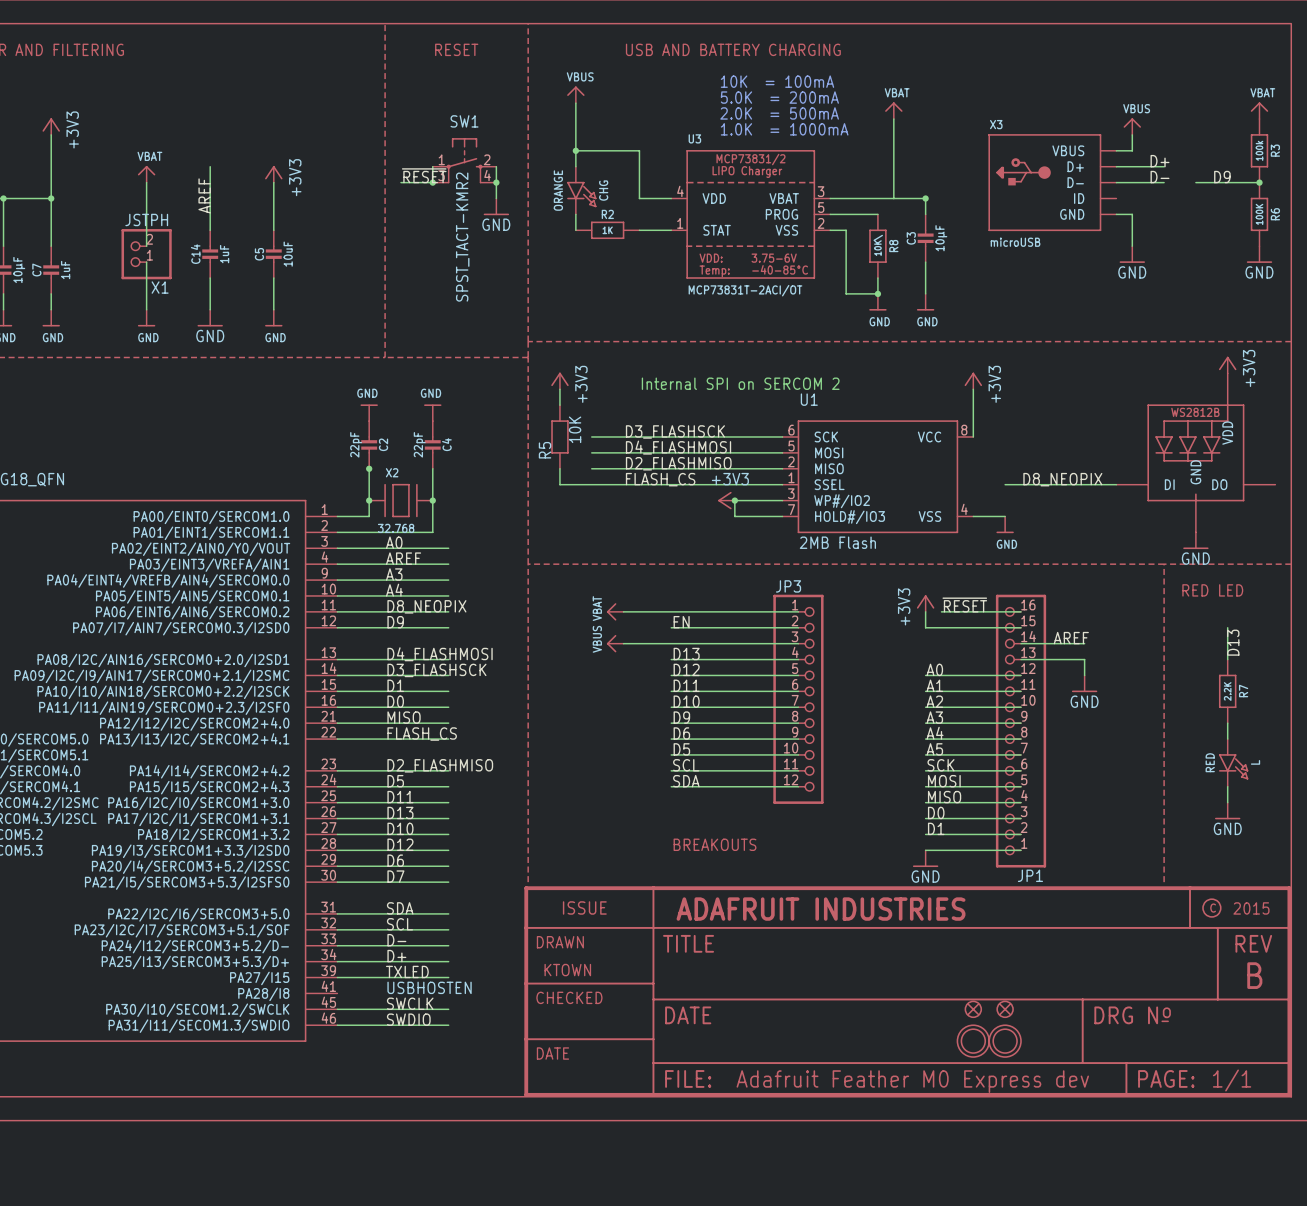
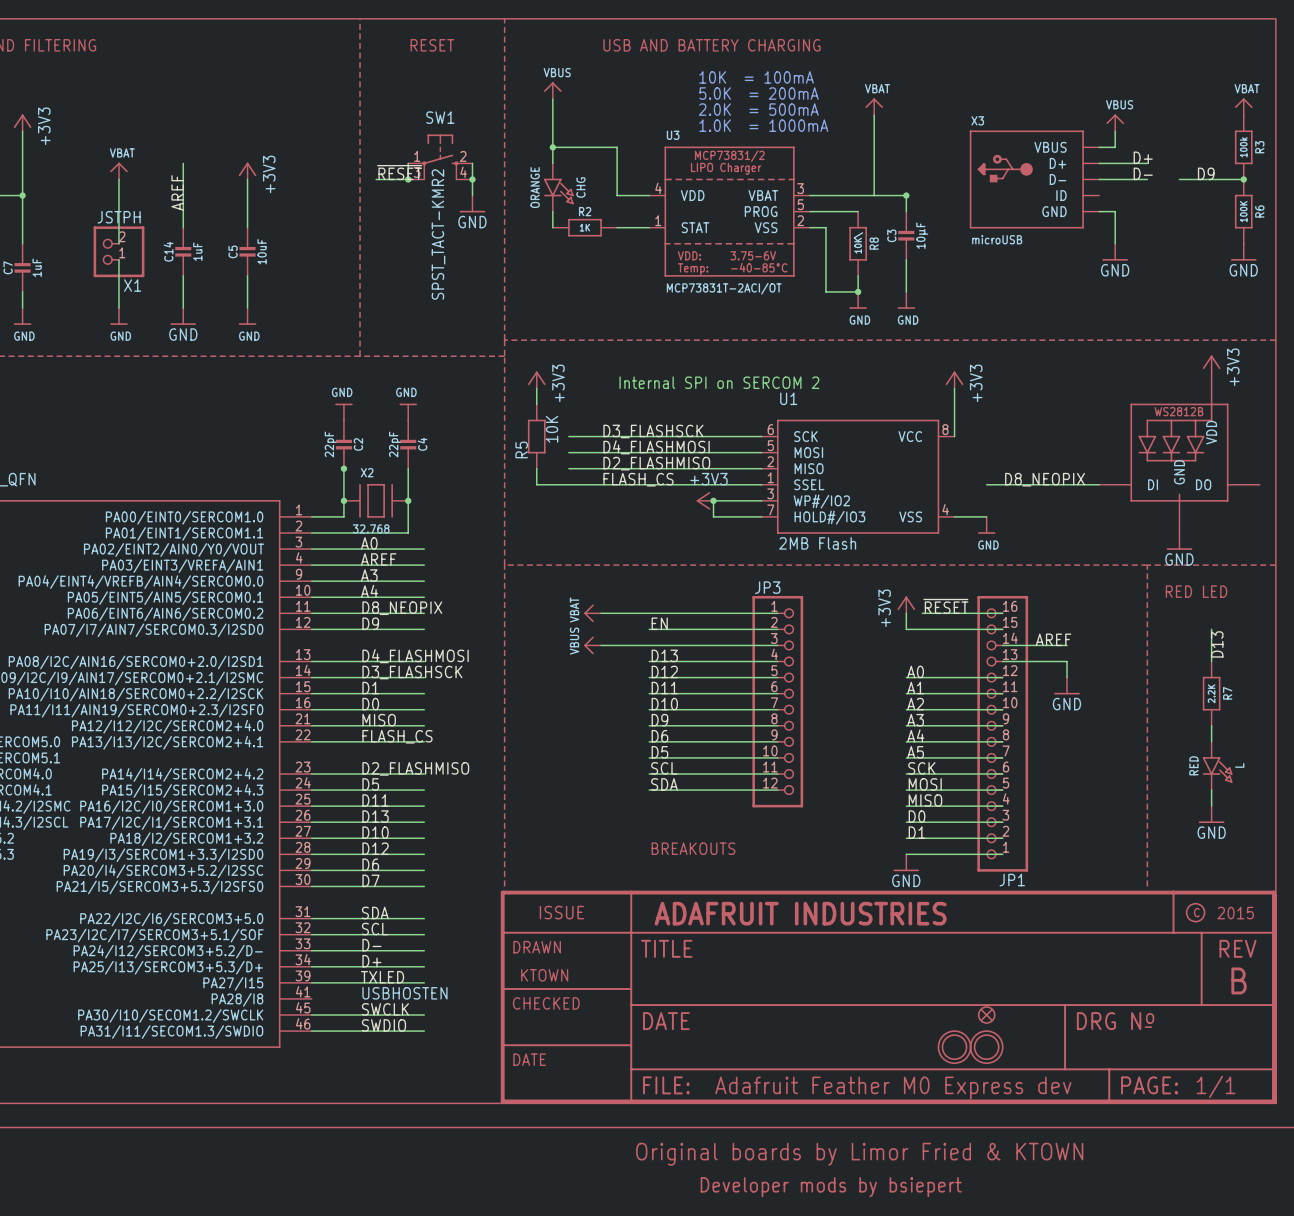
part: (973, 1009) -> none
text: none -> Original boards by Limor Fried & KTOWN (859, 1154)
text: none -> Developer mods by bsiepert (831, 1187)

